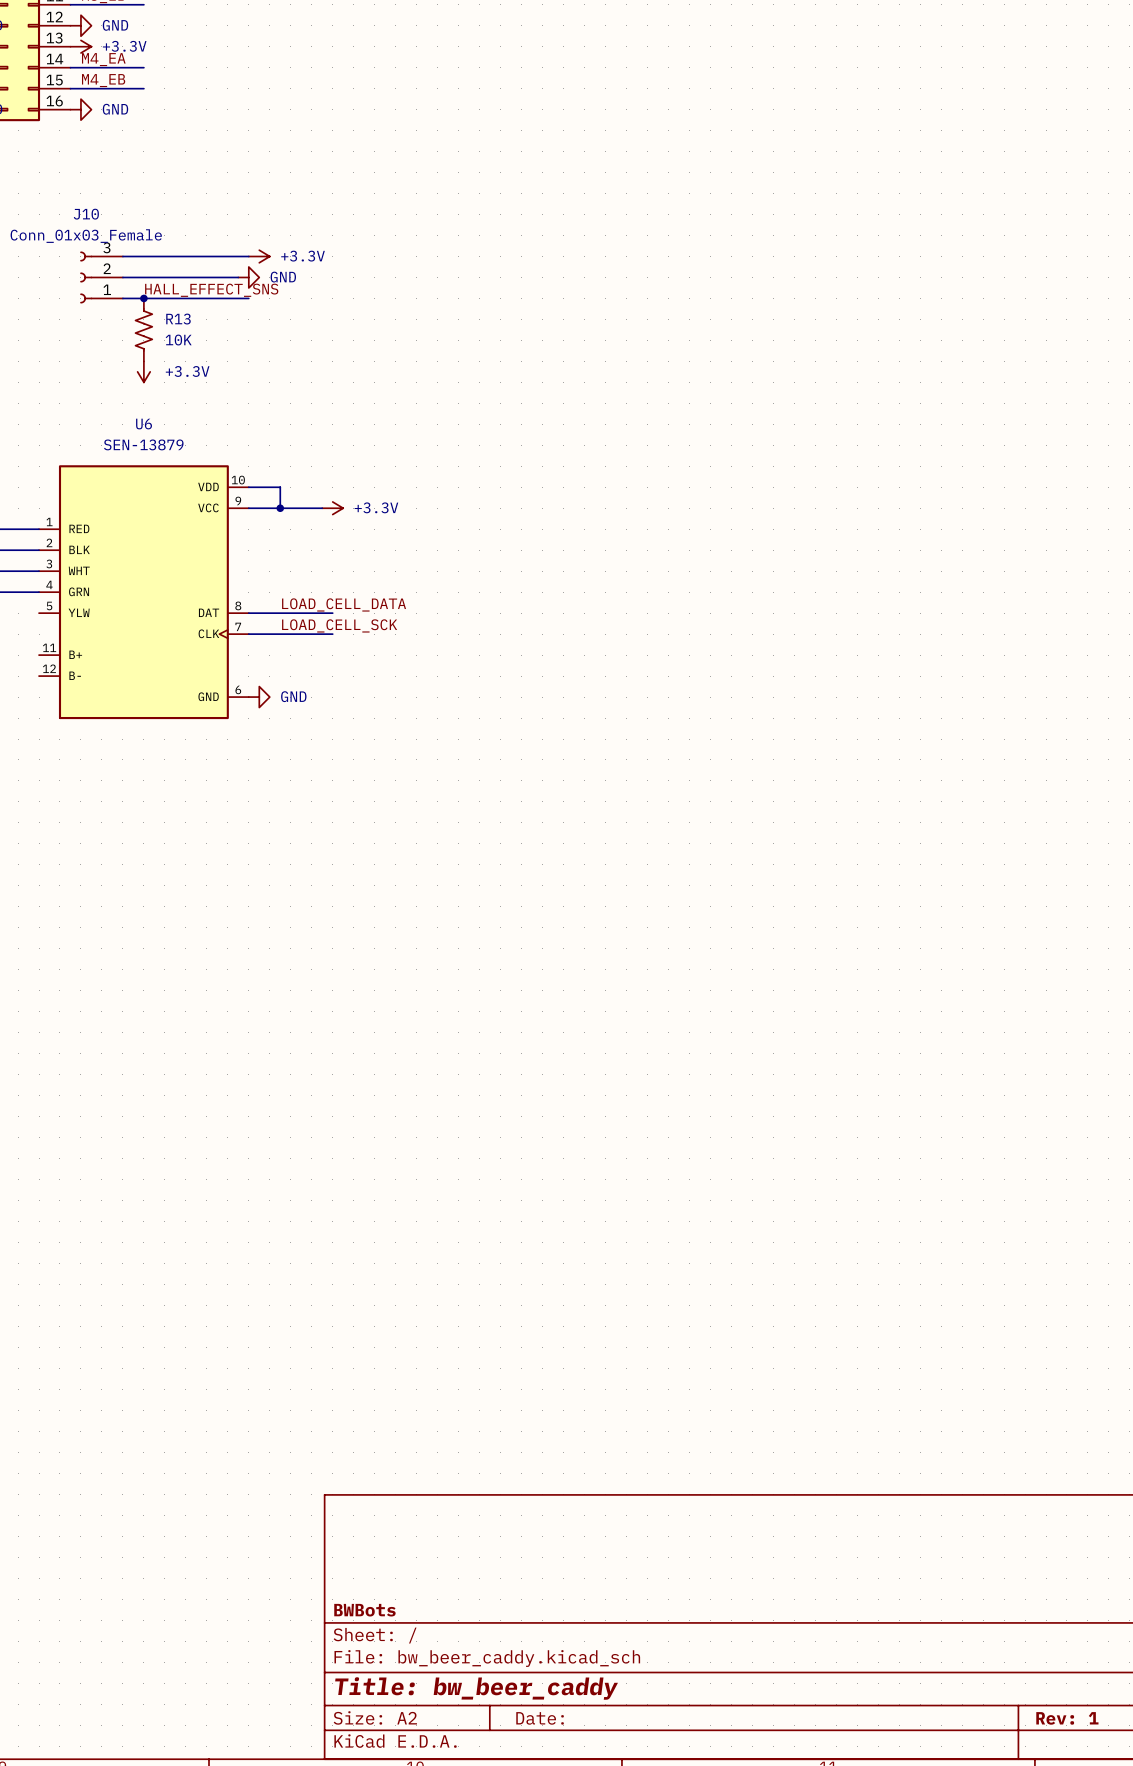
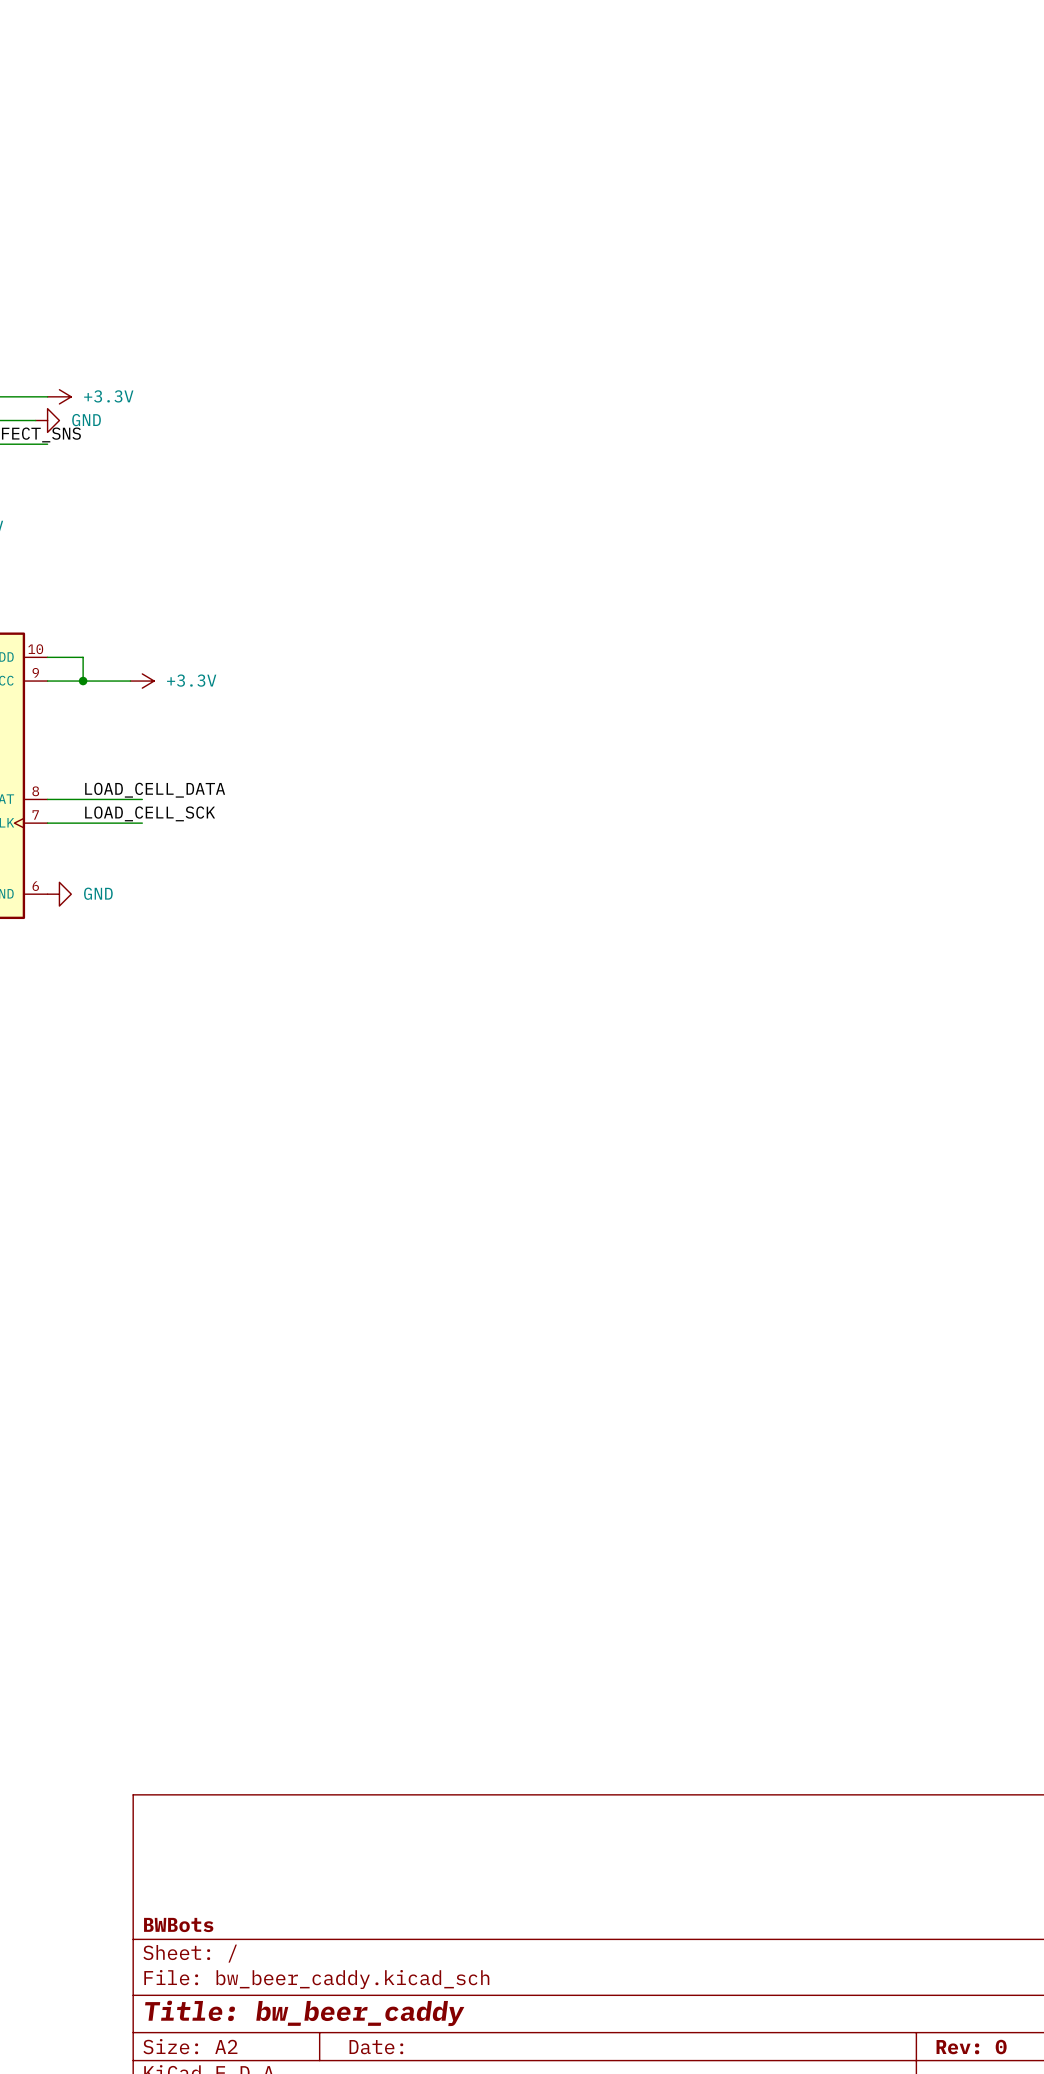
title block: Rev: 1 (1067, 1718) -> Rev: 0 (971, 2047)

